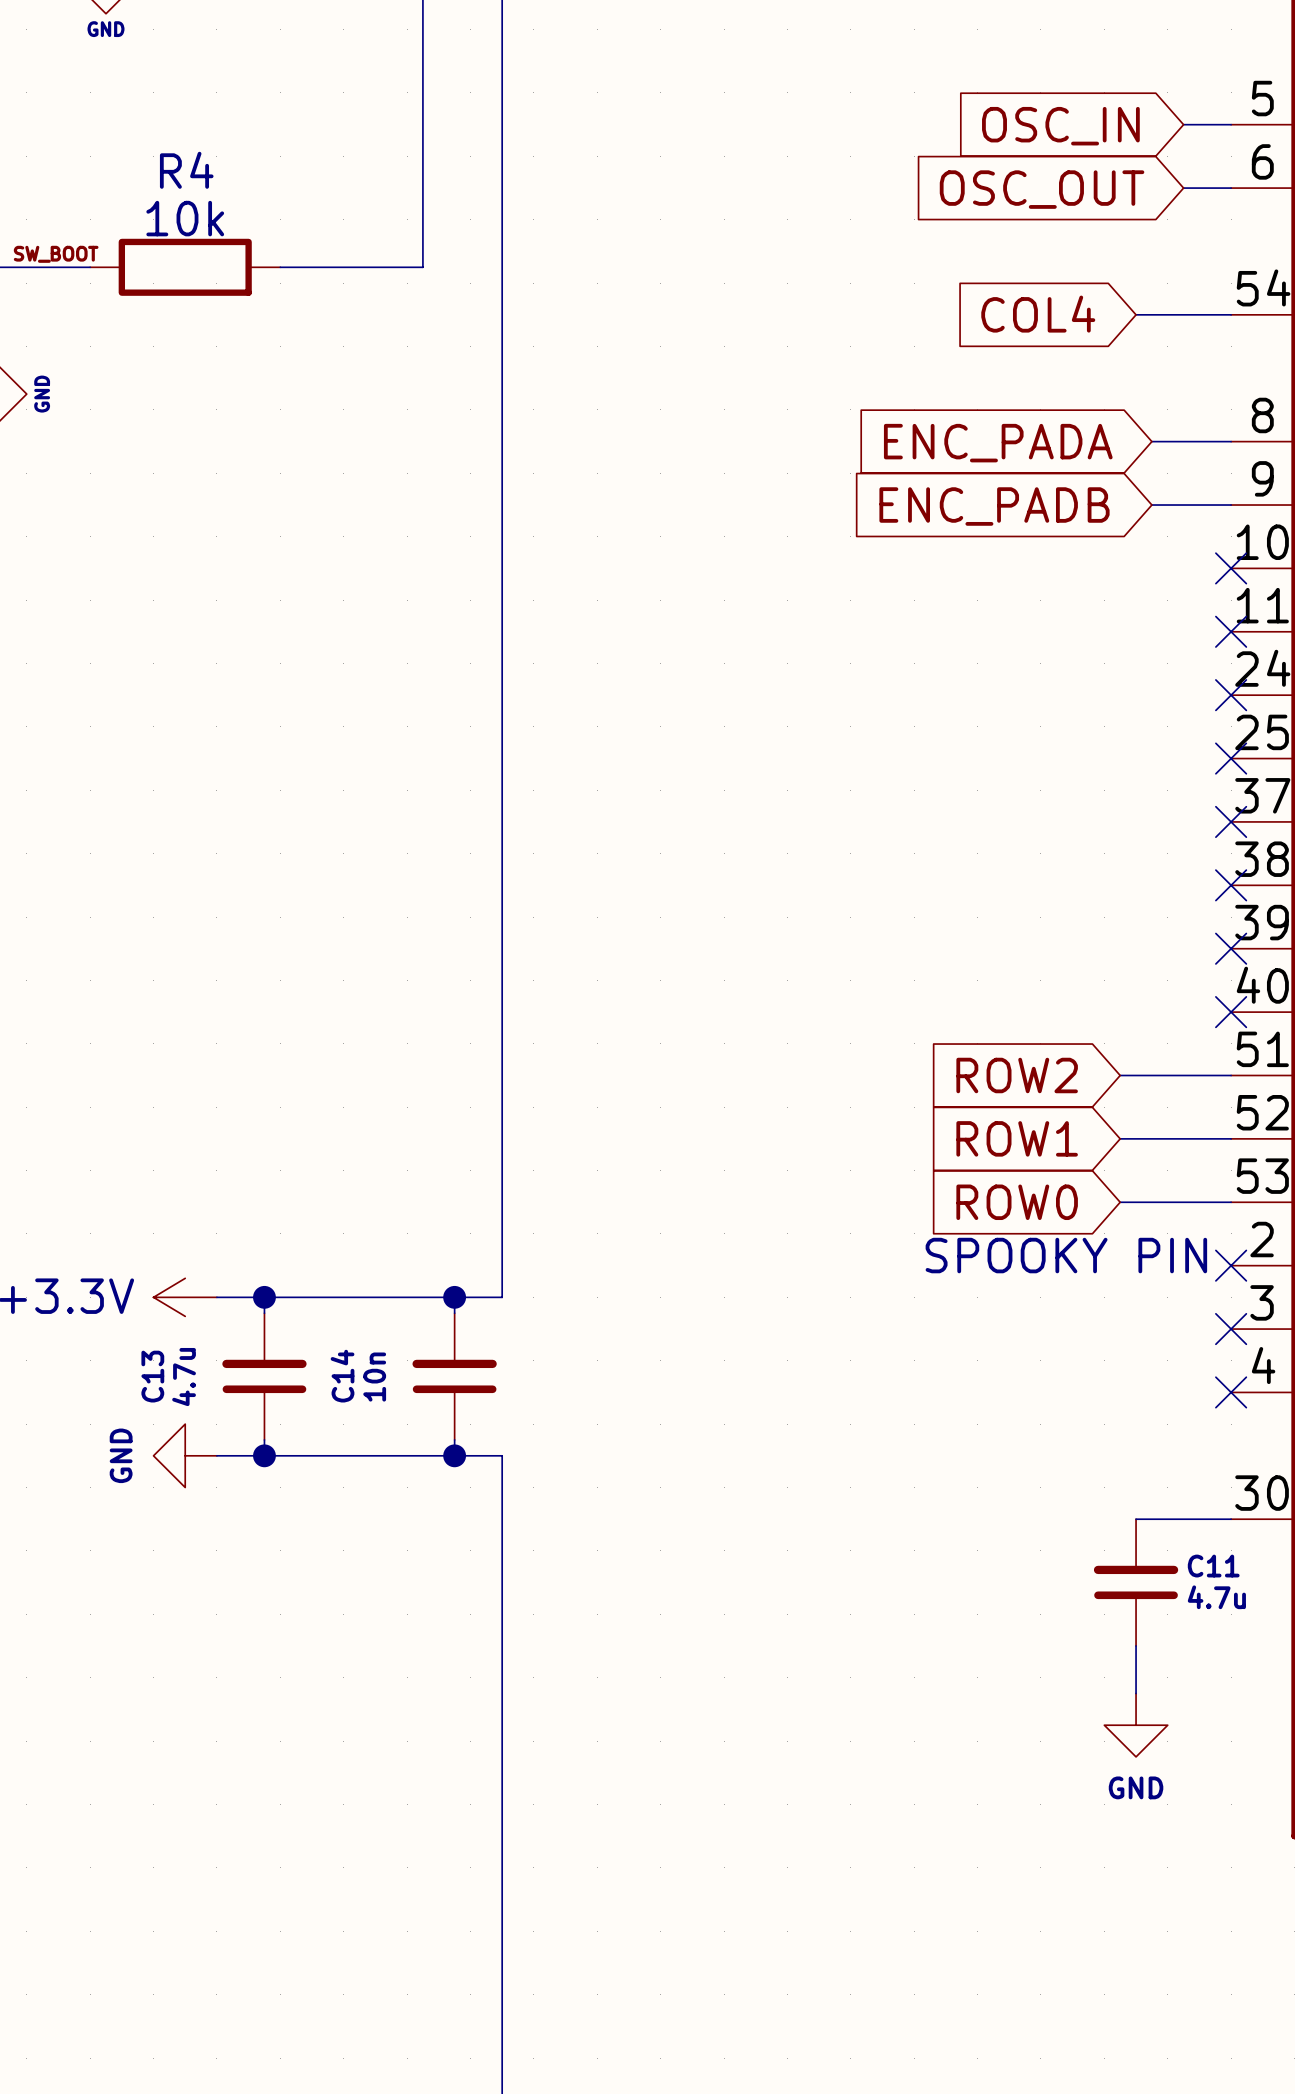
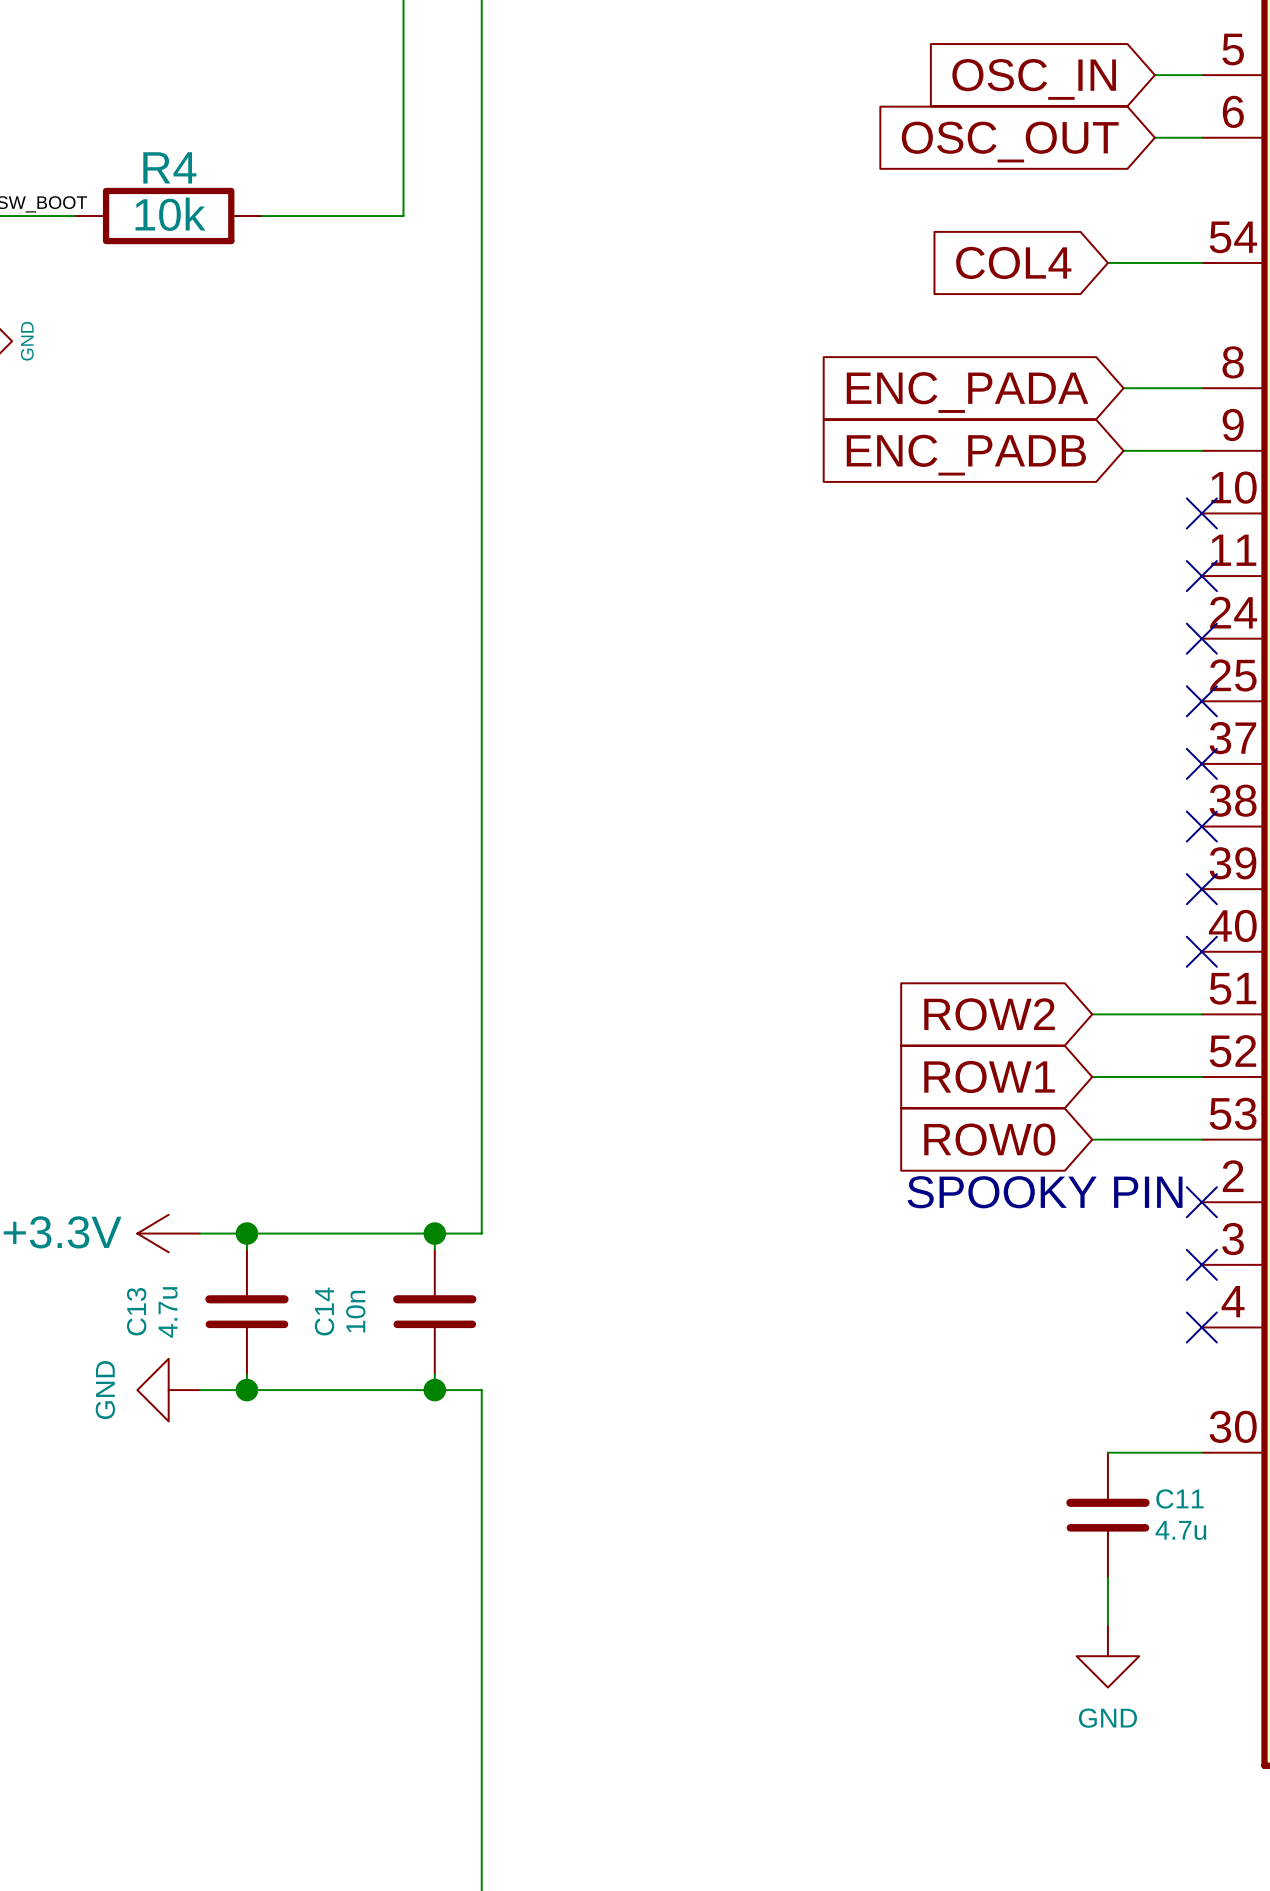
R4 name position: R4 (186, 170) -> R4 (169, 167)
R4 value position: 10k (185, 218) -> 10k (170, 214)

